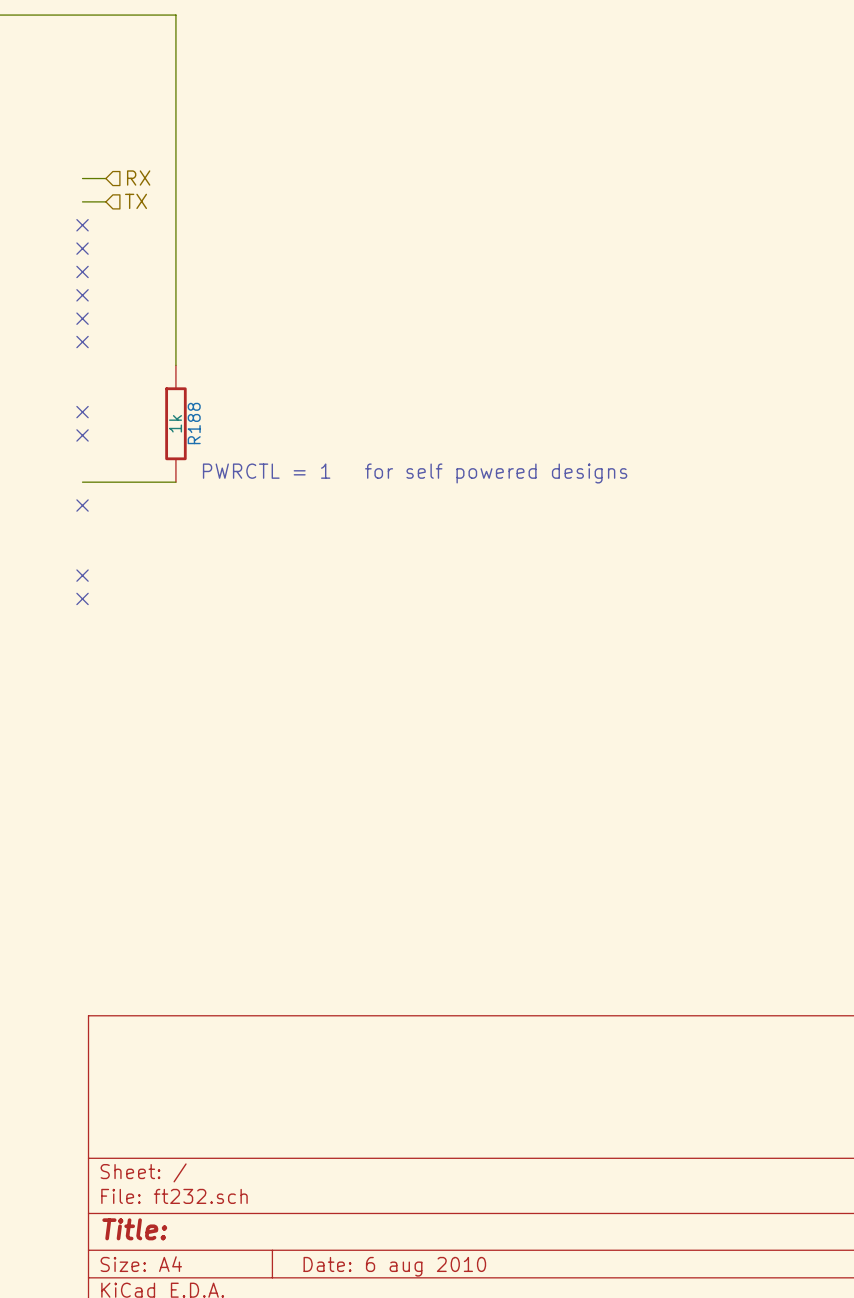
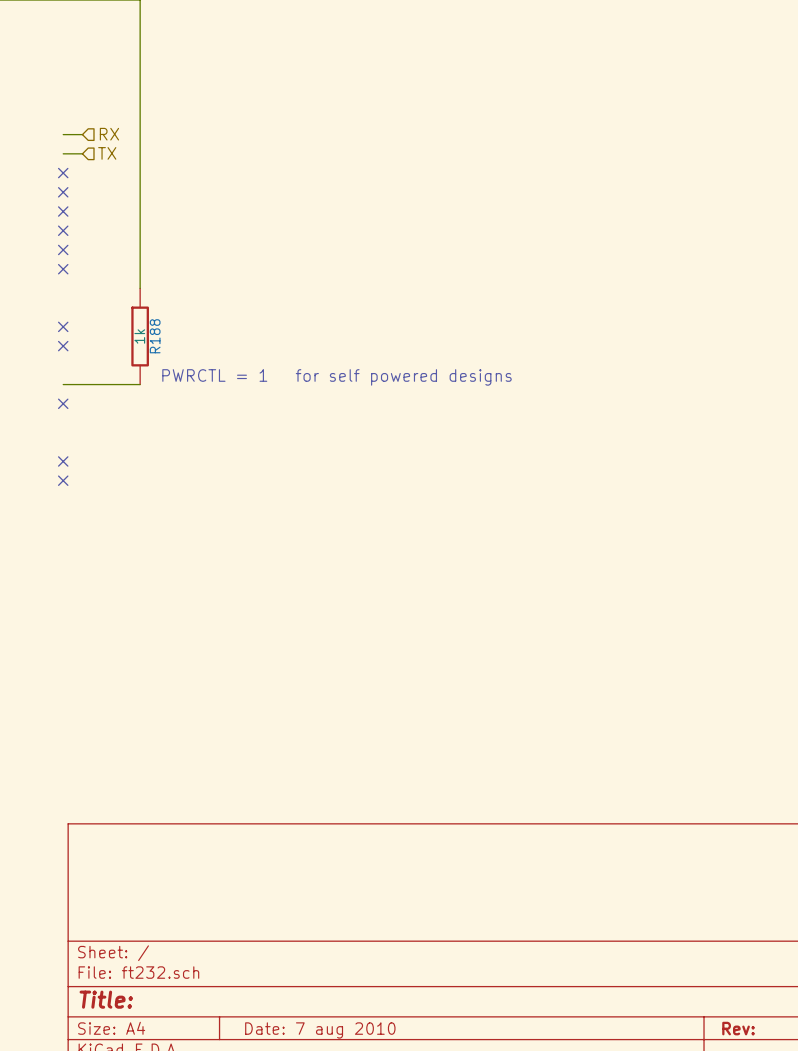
title block: Date: 6 aug 2010 (394, 1266) -> Date: 7 aug 2010 (320, 1030)

